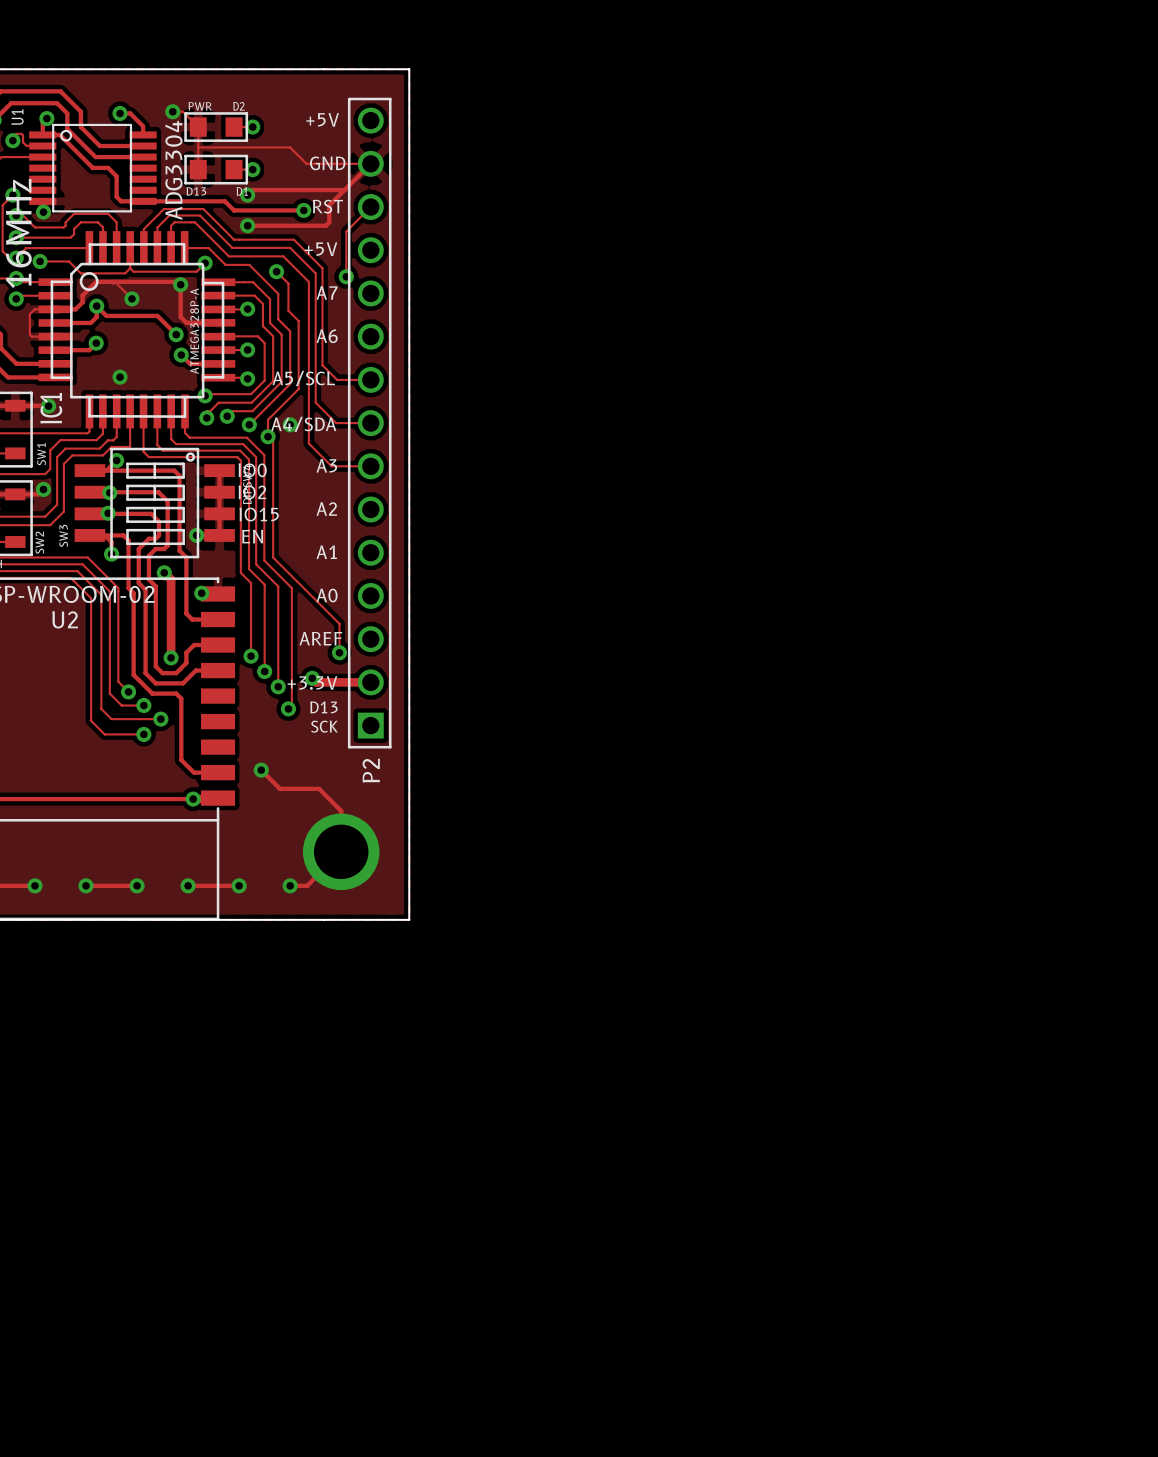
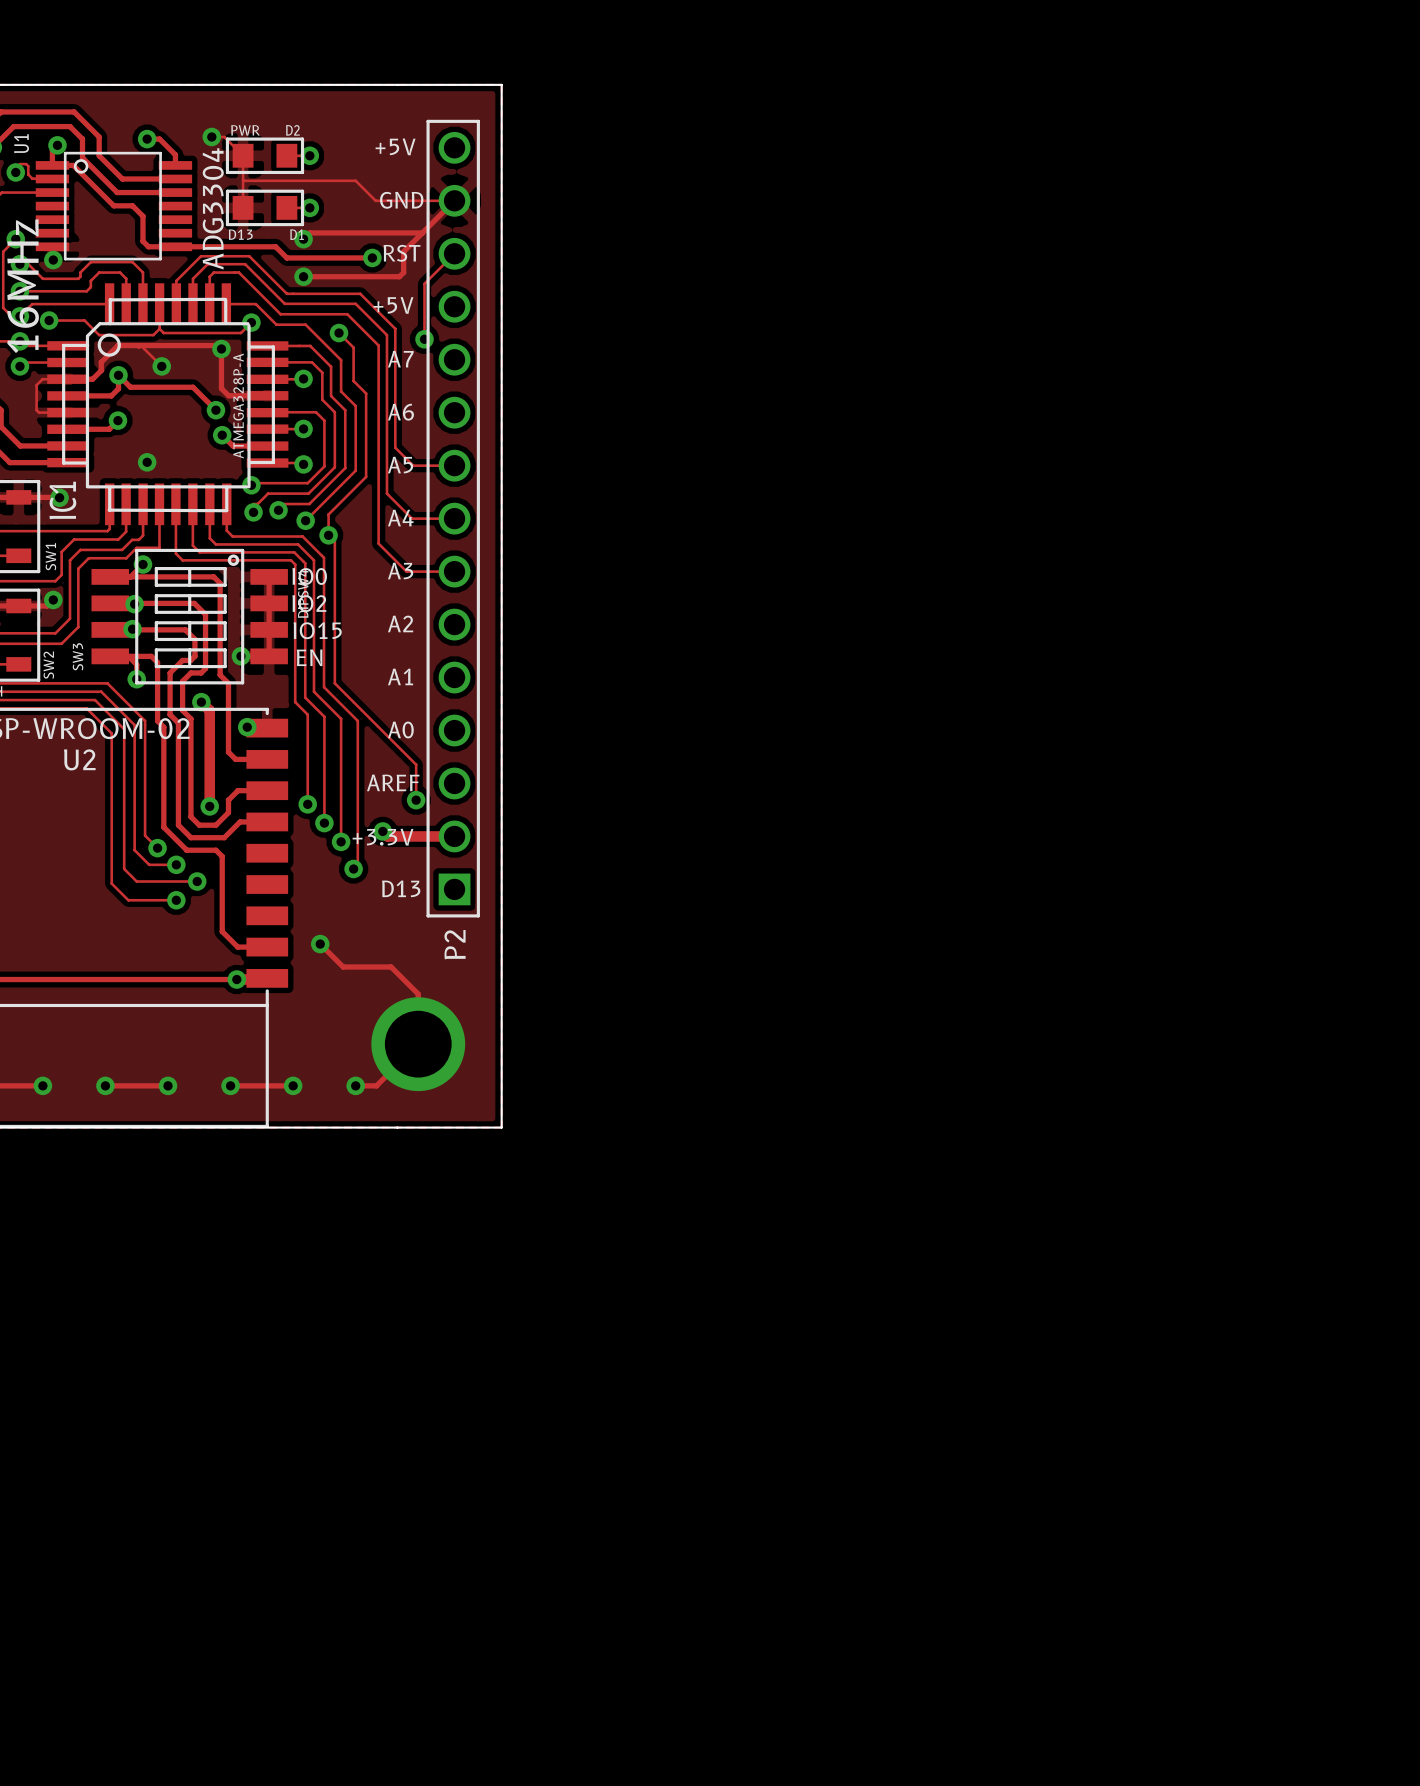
text: A5/SCL (303, 378) -> none
text: none -> A5 (400, 465)
text: none -> A4 (400, 518)
via: (290, 424) -> none
text: A4/SDA (303, 424) -> none
text: D13 (323, 707) -> none
text: SCK (324, 726) -> D13 (401, 888)

